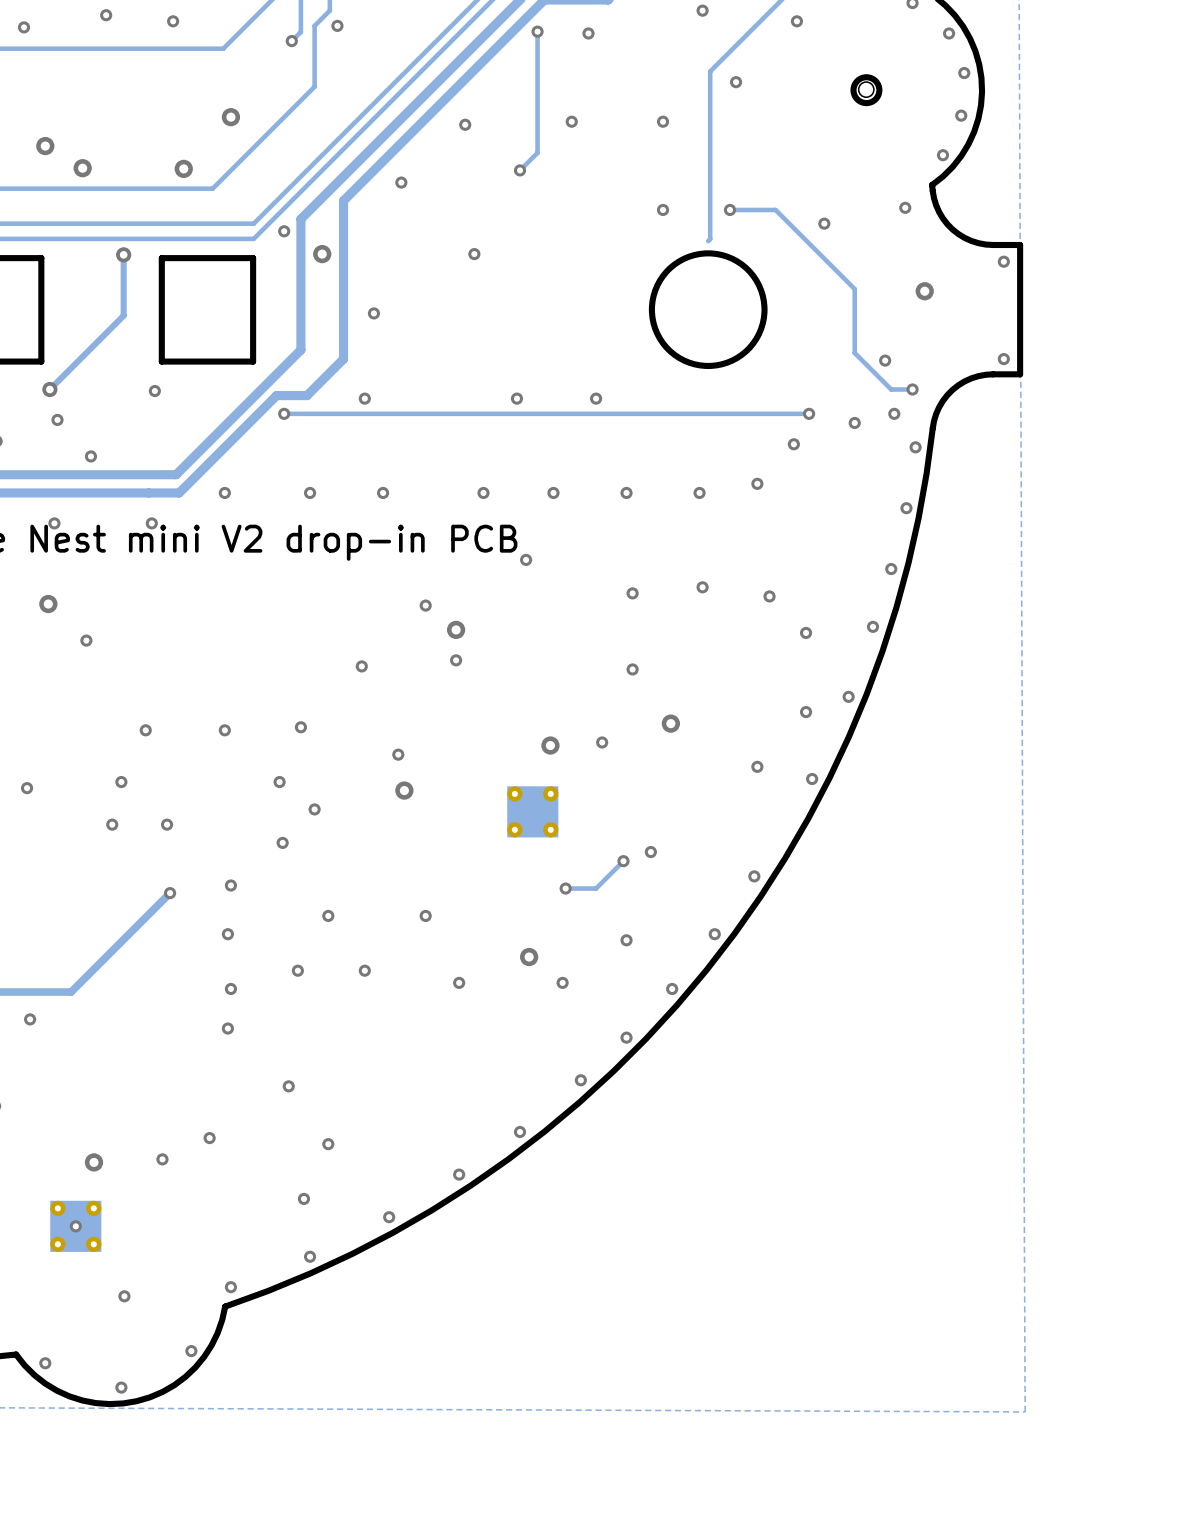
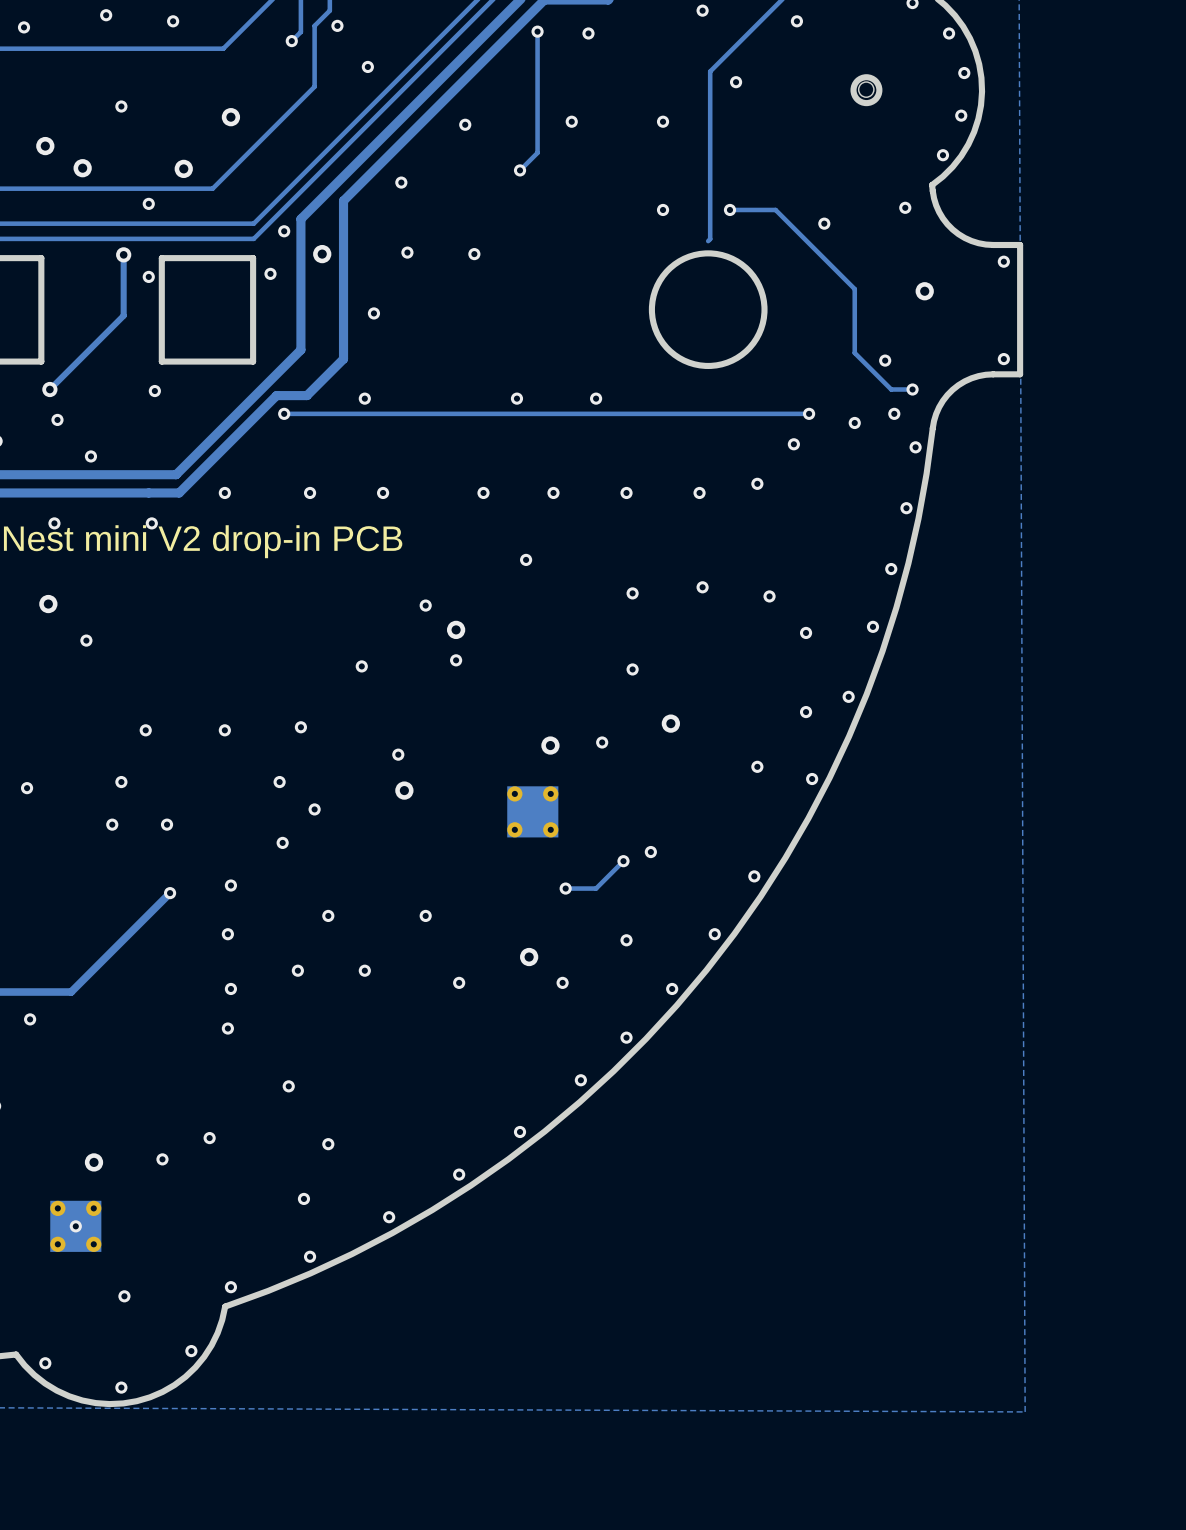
via: none -> (367, 66)
via: none -> (121, 106)
via: none -> (148, 203)
via: none -> (407, 252)
via: none -> (270, 273)
via: none -> (148, 276)

